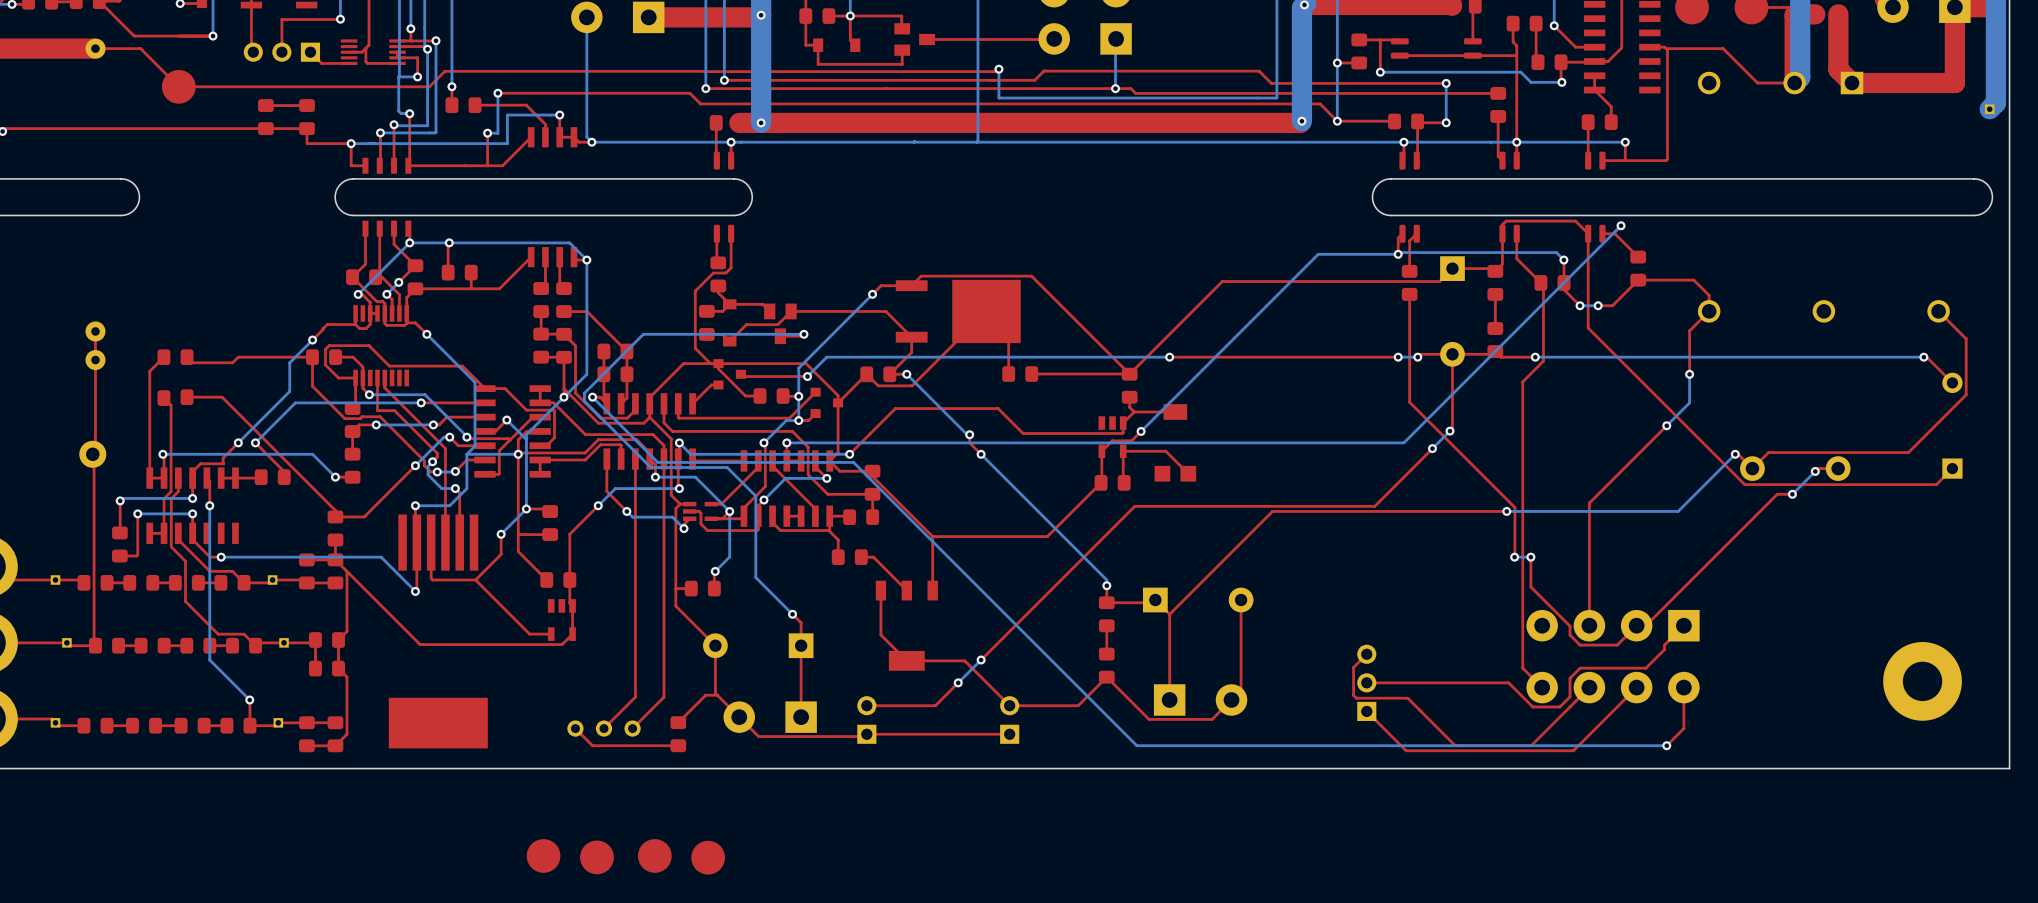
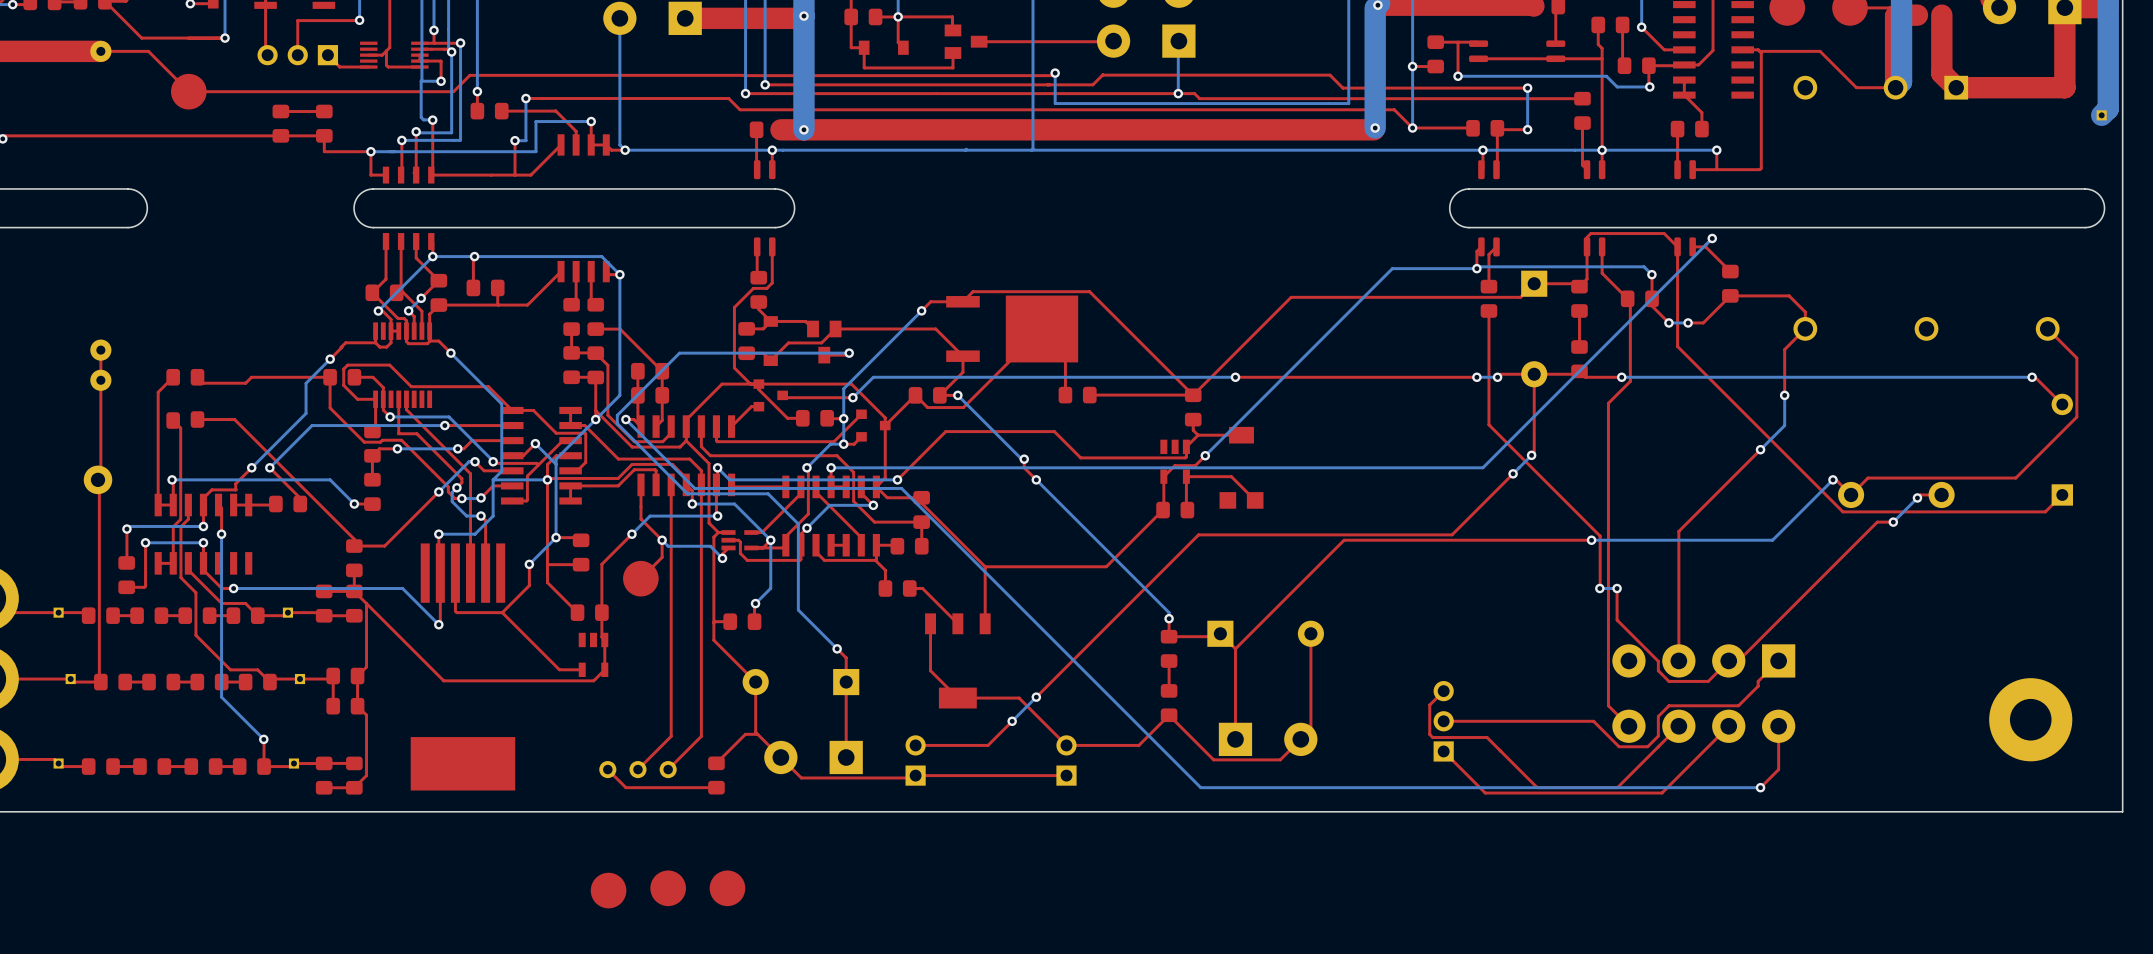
top track: none -> (662, 540) (662, 557) (640, 578)
part: none -> (640, 578)
part: none -> (668, 888)
part: none -> (727, 888)
part: none -> (608, 890)
part: (543, 855) -> none
part: (654, 855) -> none
part: (597, 857) -> none
part: (708, 857) -> none

